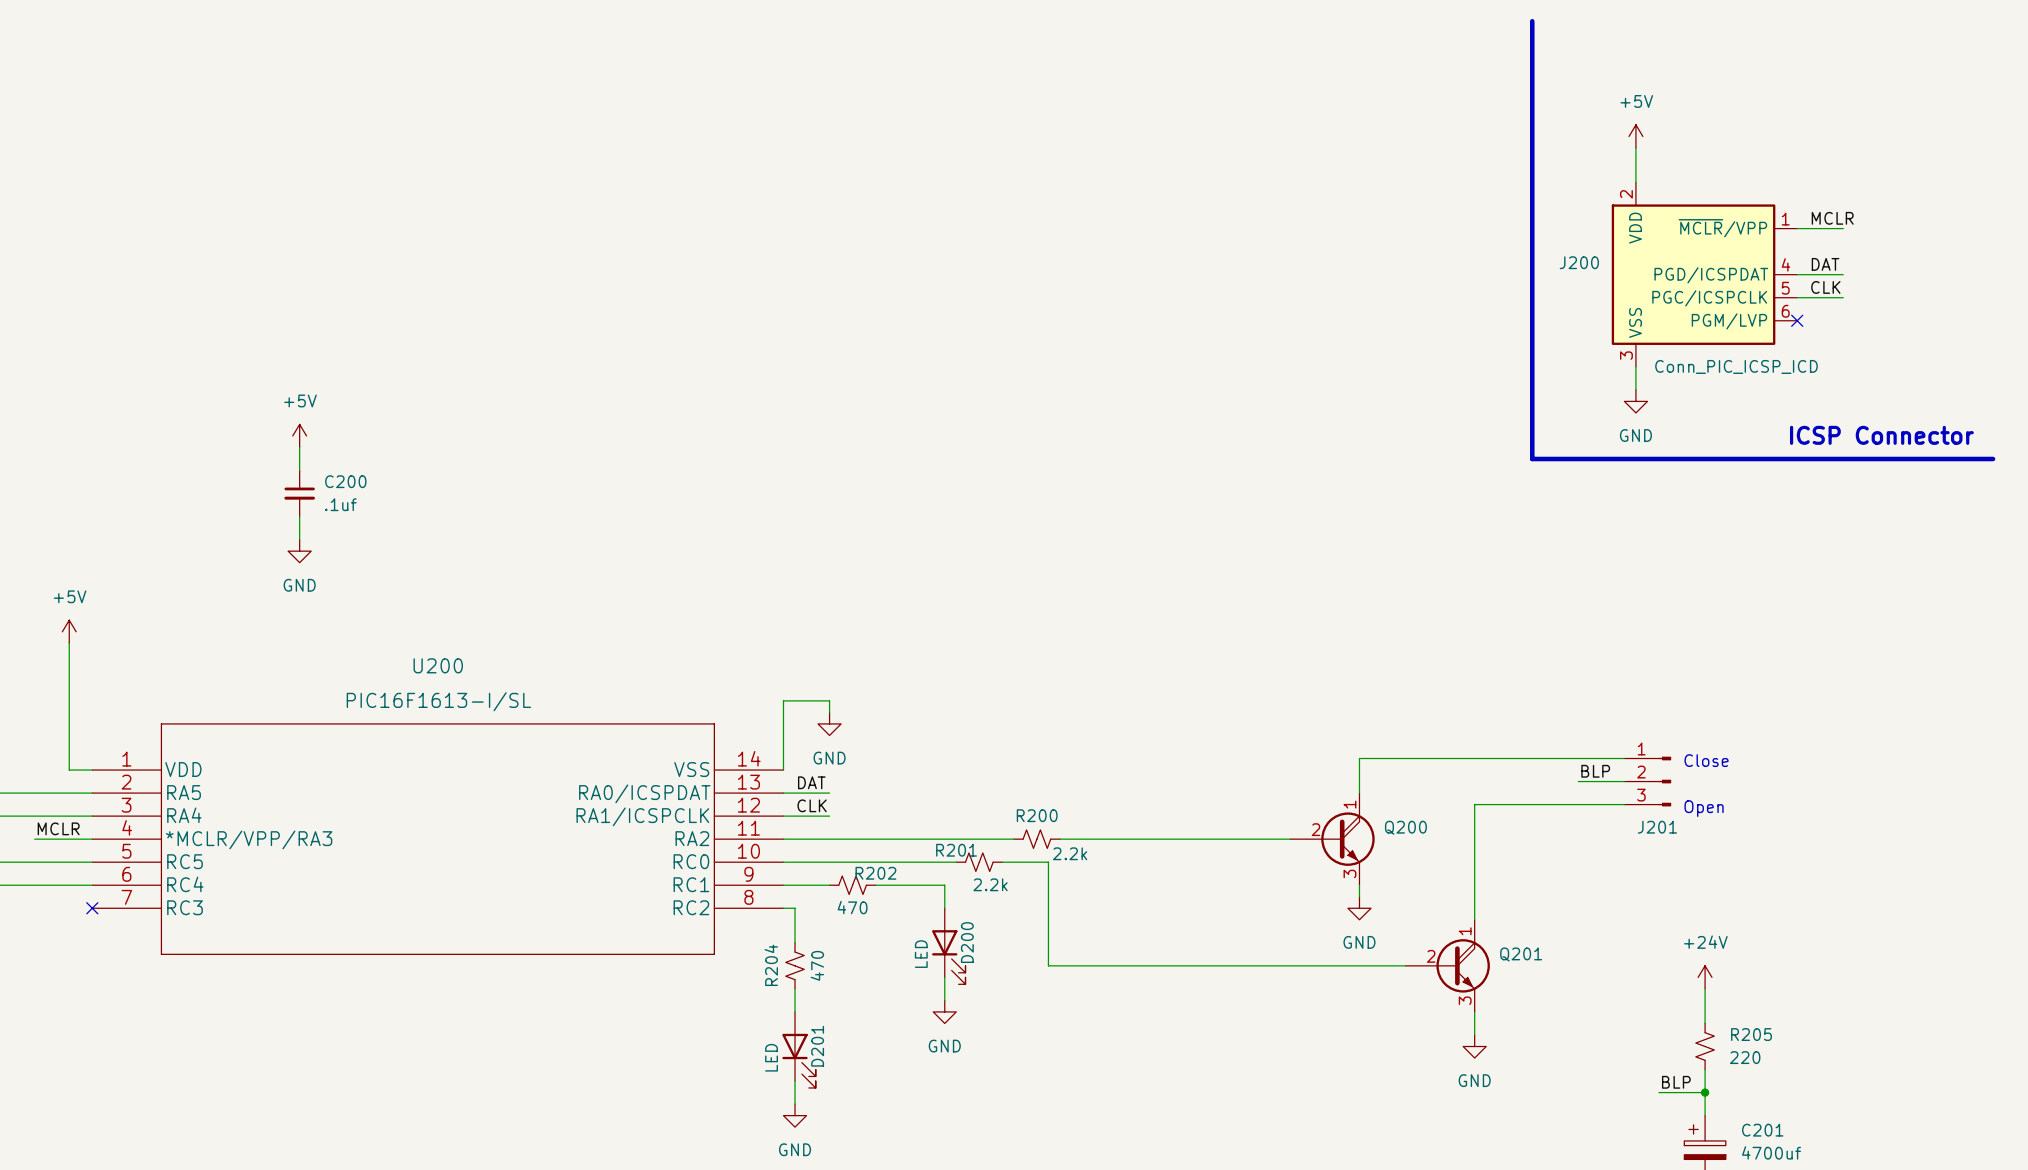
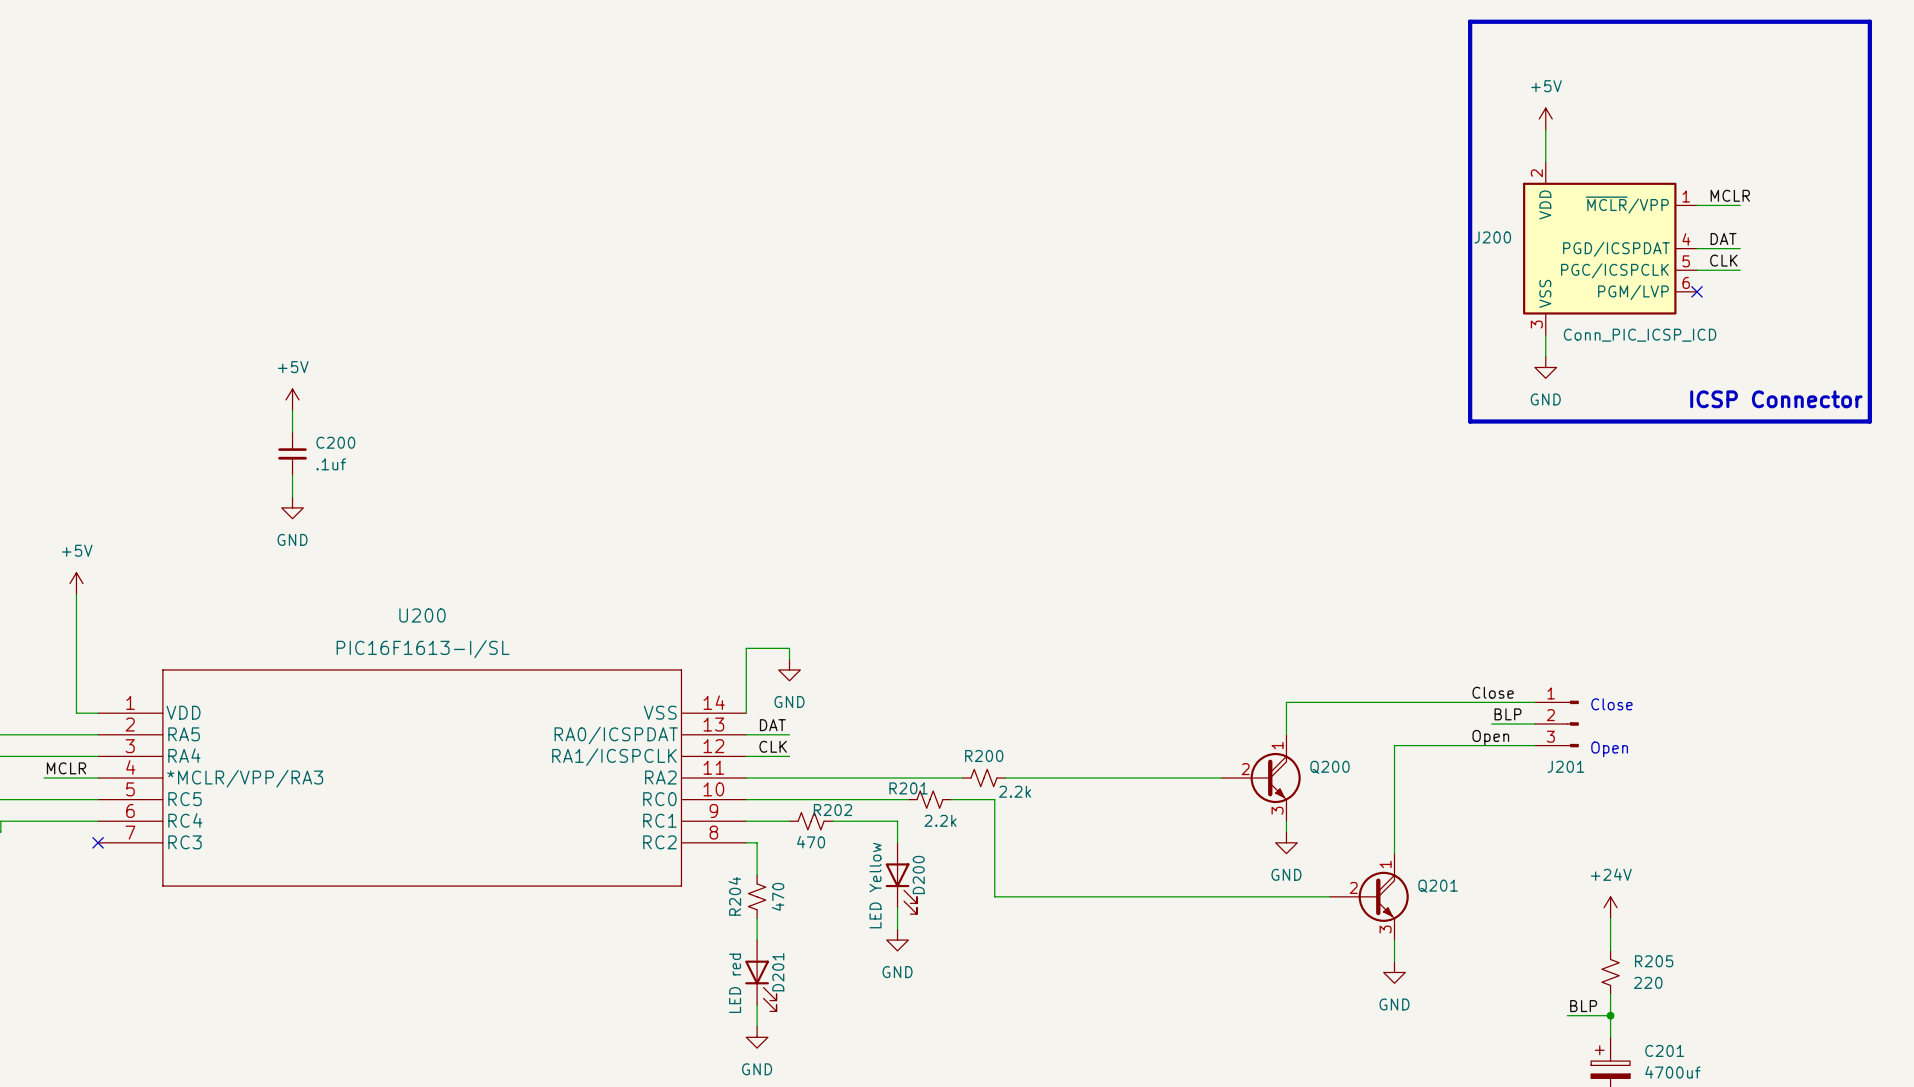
line: (1532, 21) (1532, 459) (1555, 459) -> none
line: (1981, 459) (1993, 459) -> (1869, 421) (1869, 21) (1470, 21) (1470, 421)
label: none -> Close (1493, 692)
label: none -> Open (1490, 737)
D200 value: LED (921, 954) -> LED Yellow (875, 885)
D201 value: LED (771, 1057) -> LED red (735, 983)

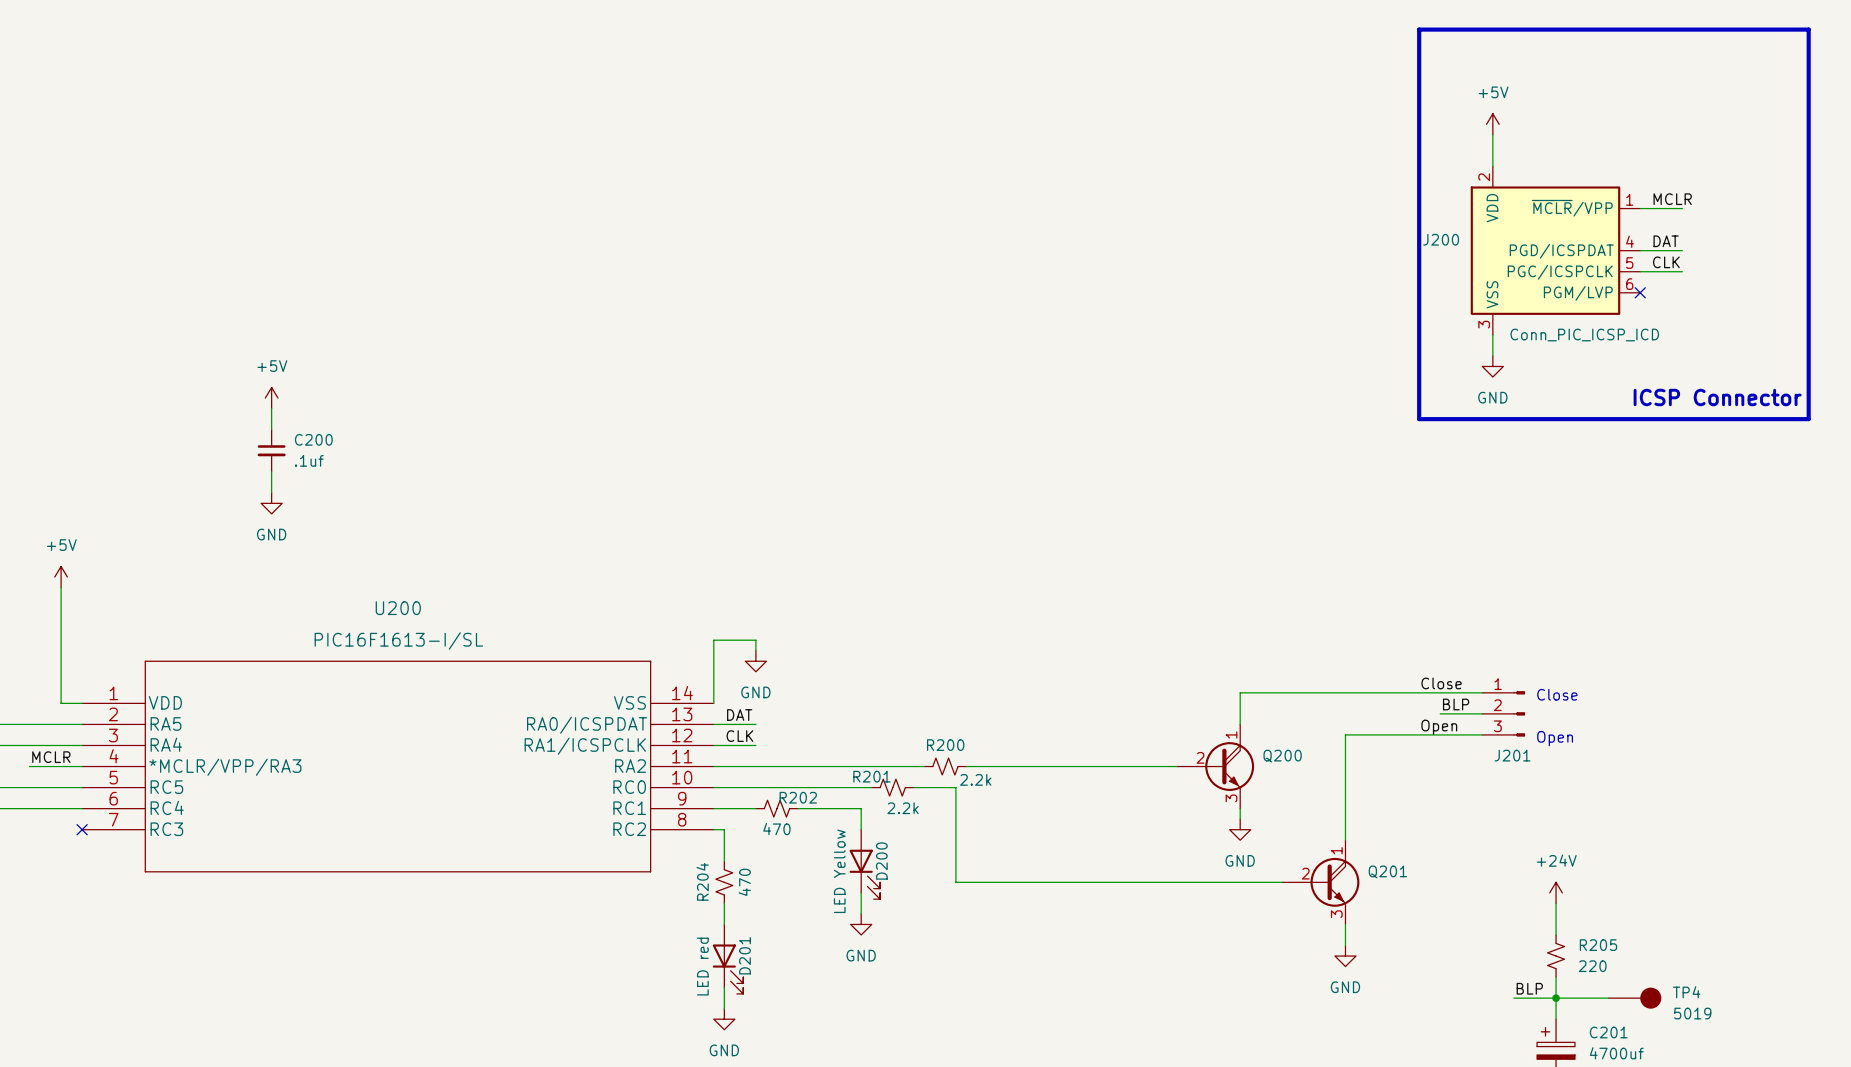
wire: none -> (1556, 998) (1608, 998)
TP4: none -> 5019 (1634, 998)

